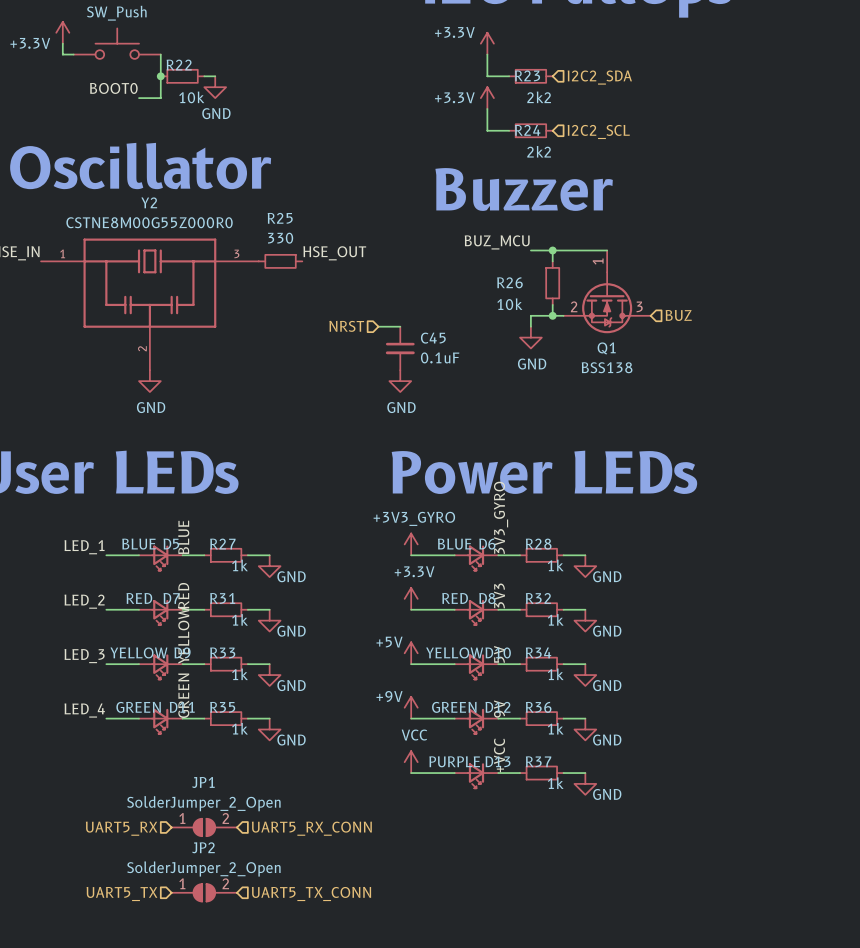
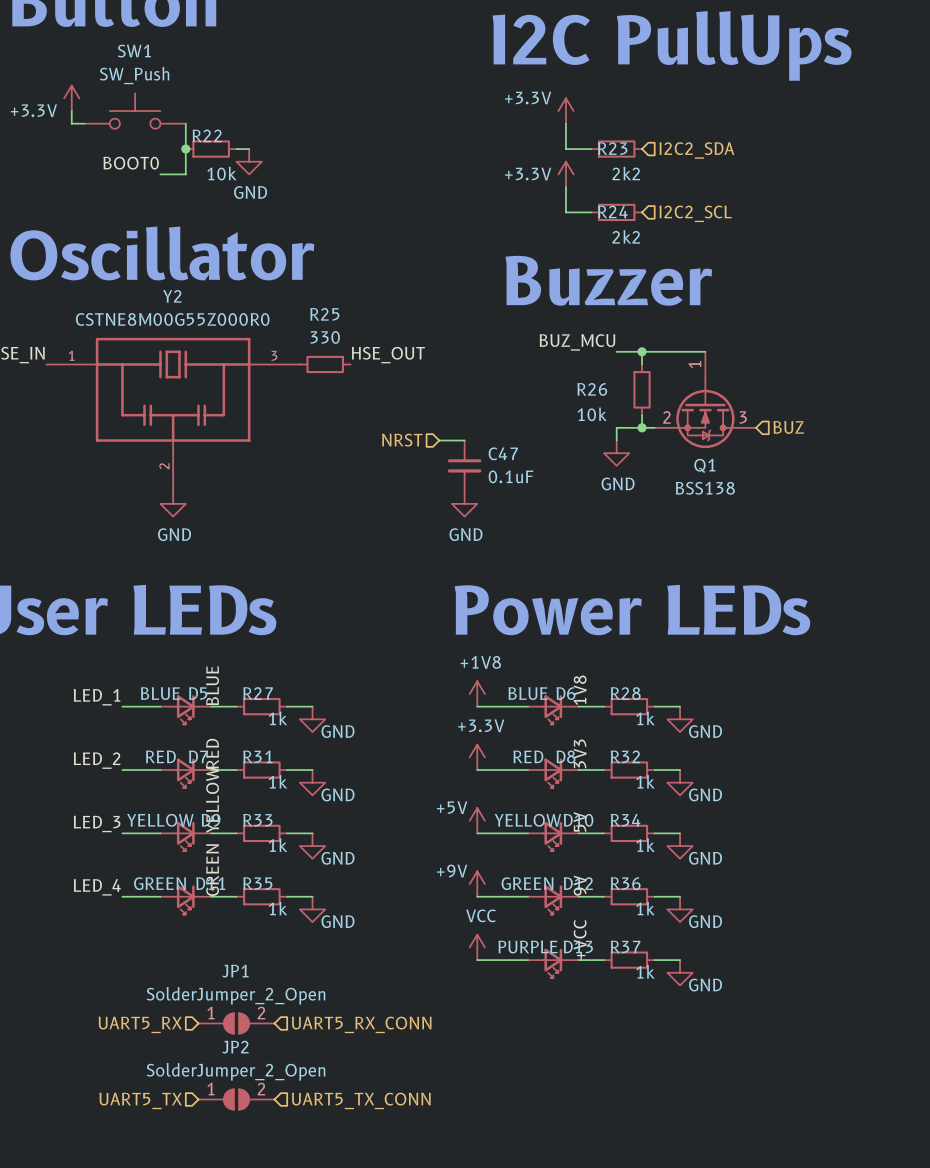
C45 name: C45 (433, 338) -> C47 (503, 453)
label: 3V3_GYRO (501, 517) -> 1V8 (580, 690)
power symbol: +3V3_GYRO (411, 544) -> +1V8 (477, 693)

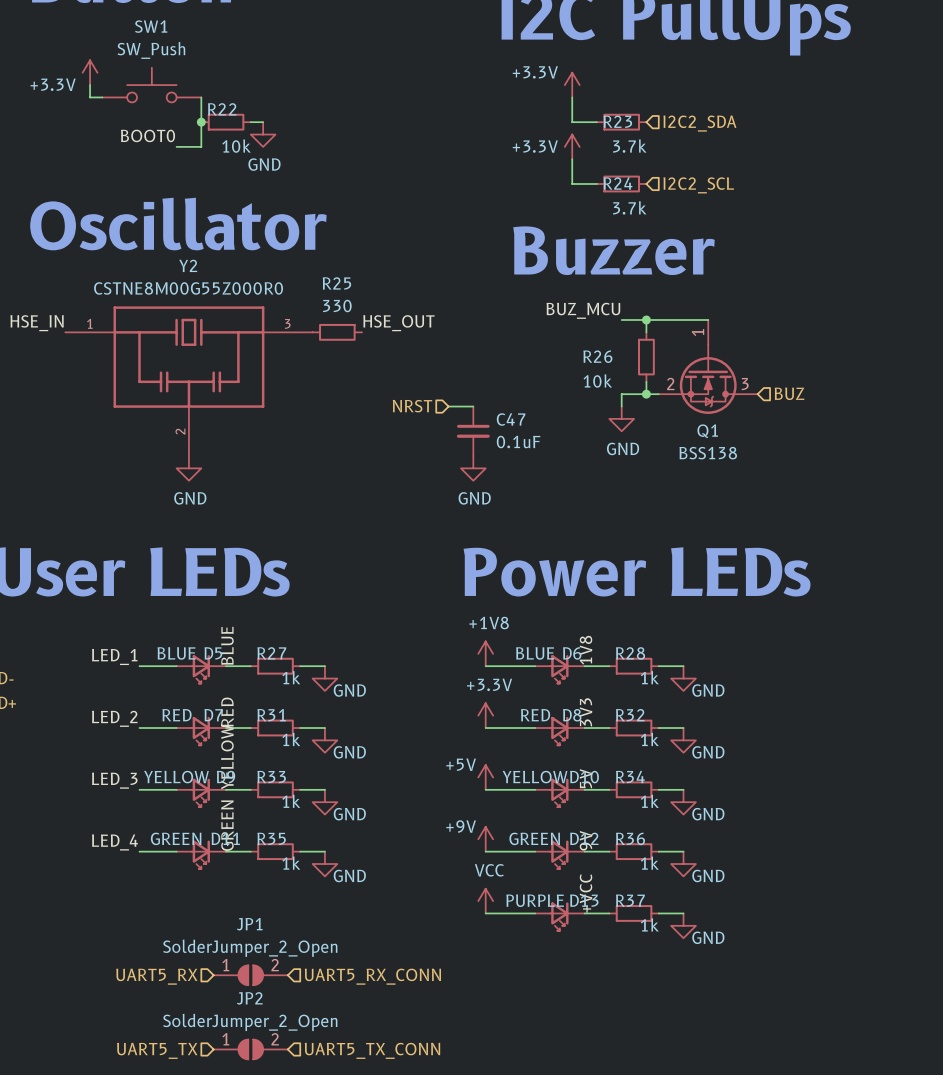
R23 value: 2k2 (626, 173) -> 3.7k (629, 146)
R24 value: 2k2 (626, 236) -> 3.7k (629, 207)

